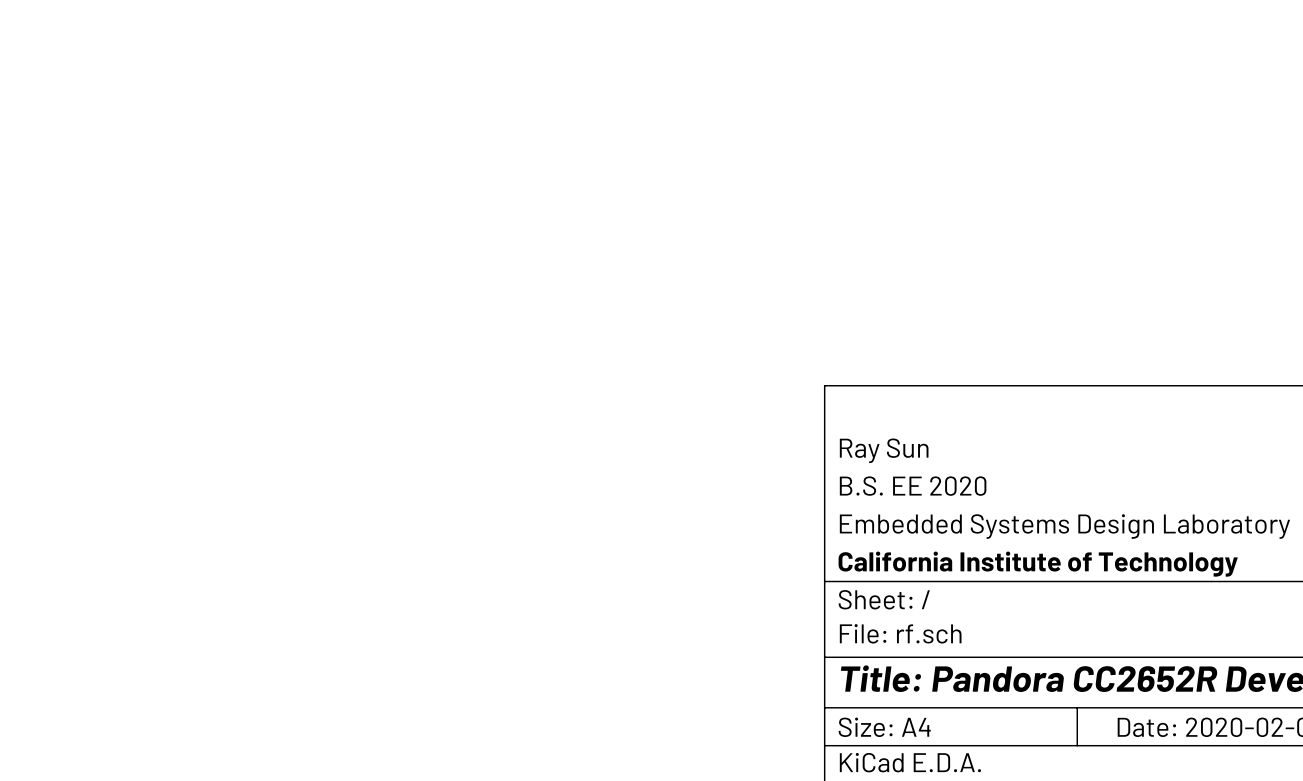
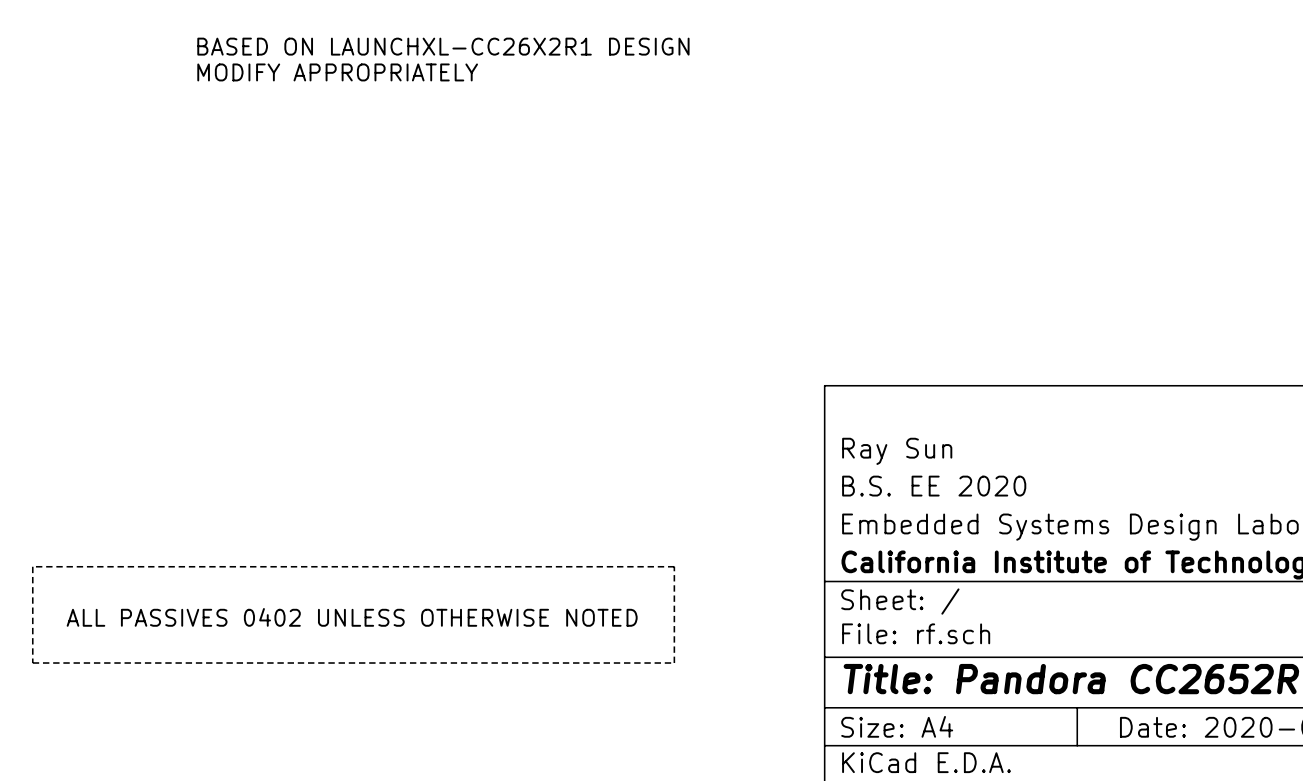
text: none -> BASED ON LAUNCHXL-CC26X2R1 DESIGN (443, 46)
text: none -> MODIFY APPROPRIATELY (337, 72)
line: none -> (32, 566) (32, 663) (674, 663) (674, 566) (32, 566)
text: none -> ALL PASSIVES 0402 UNLESS OTHERWISE NOTED (352, 617)

